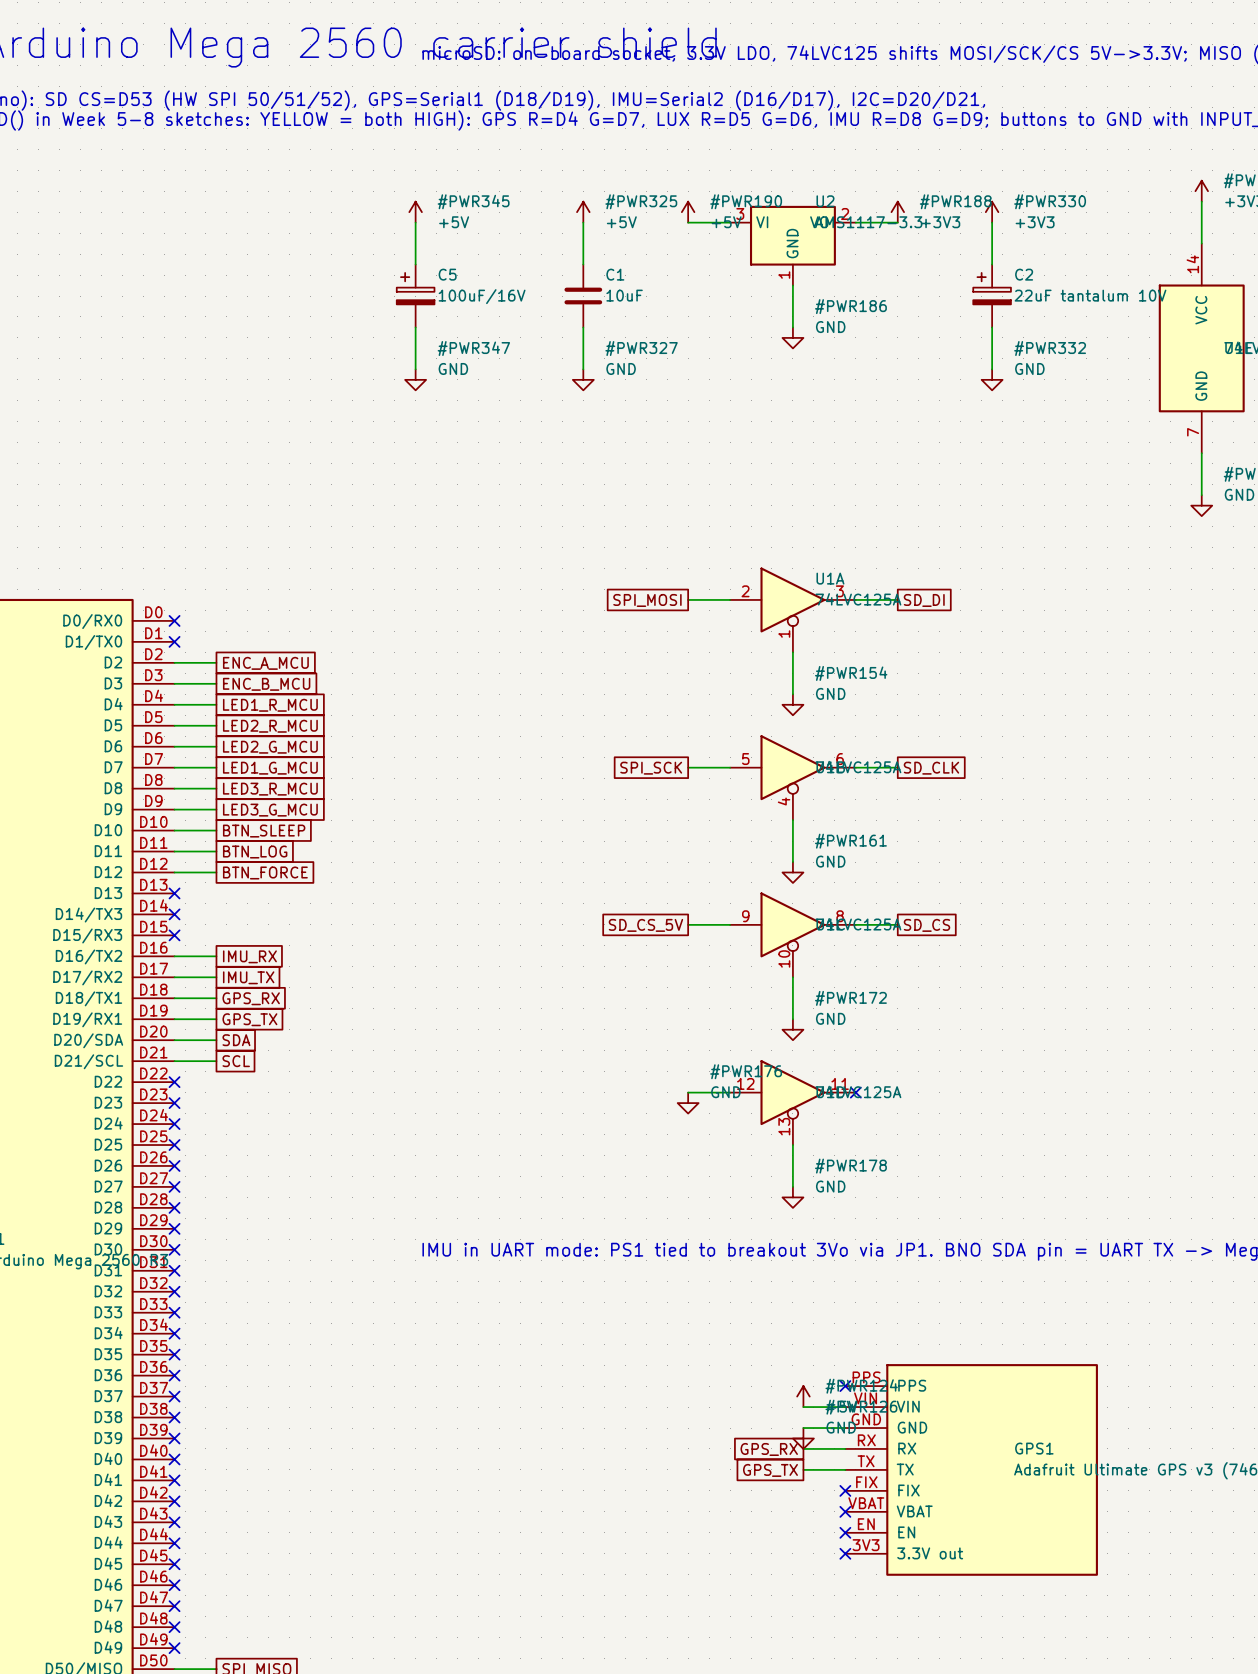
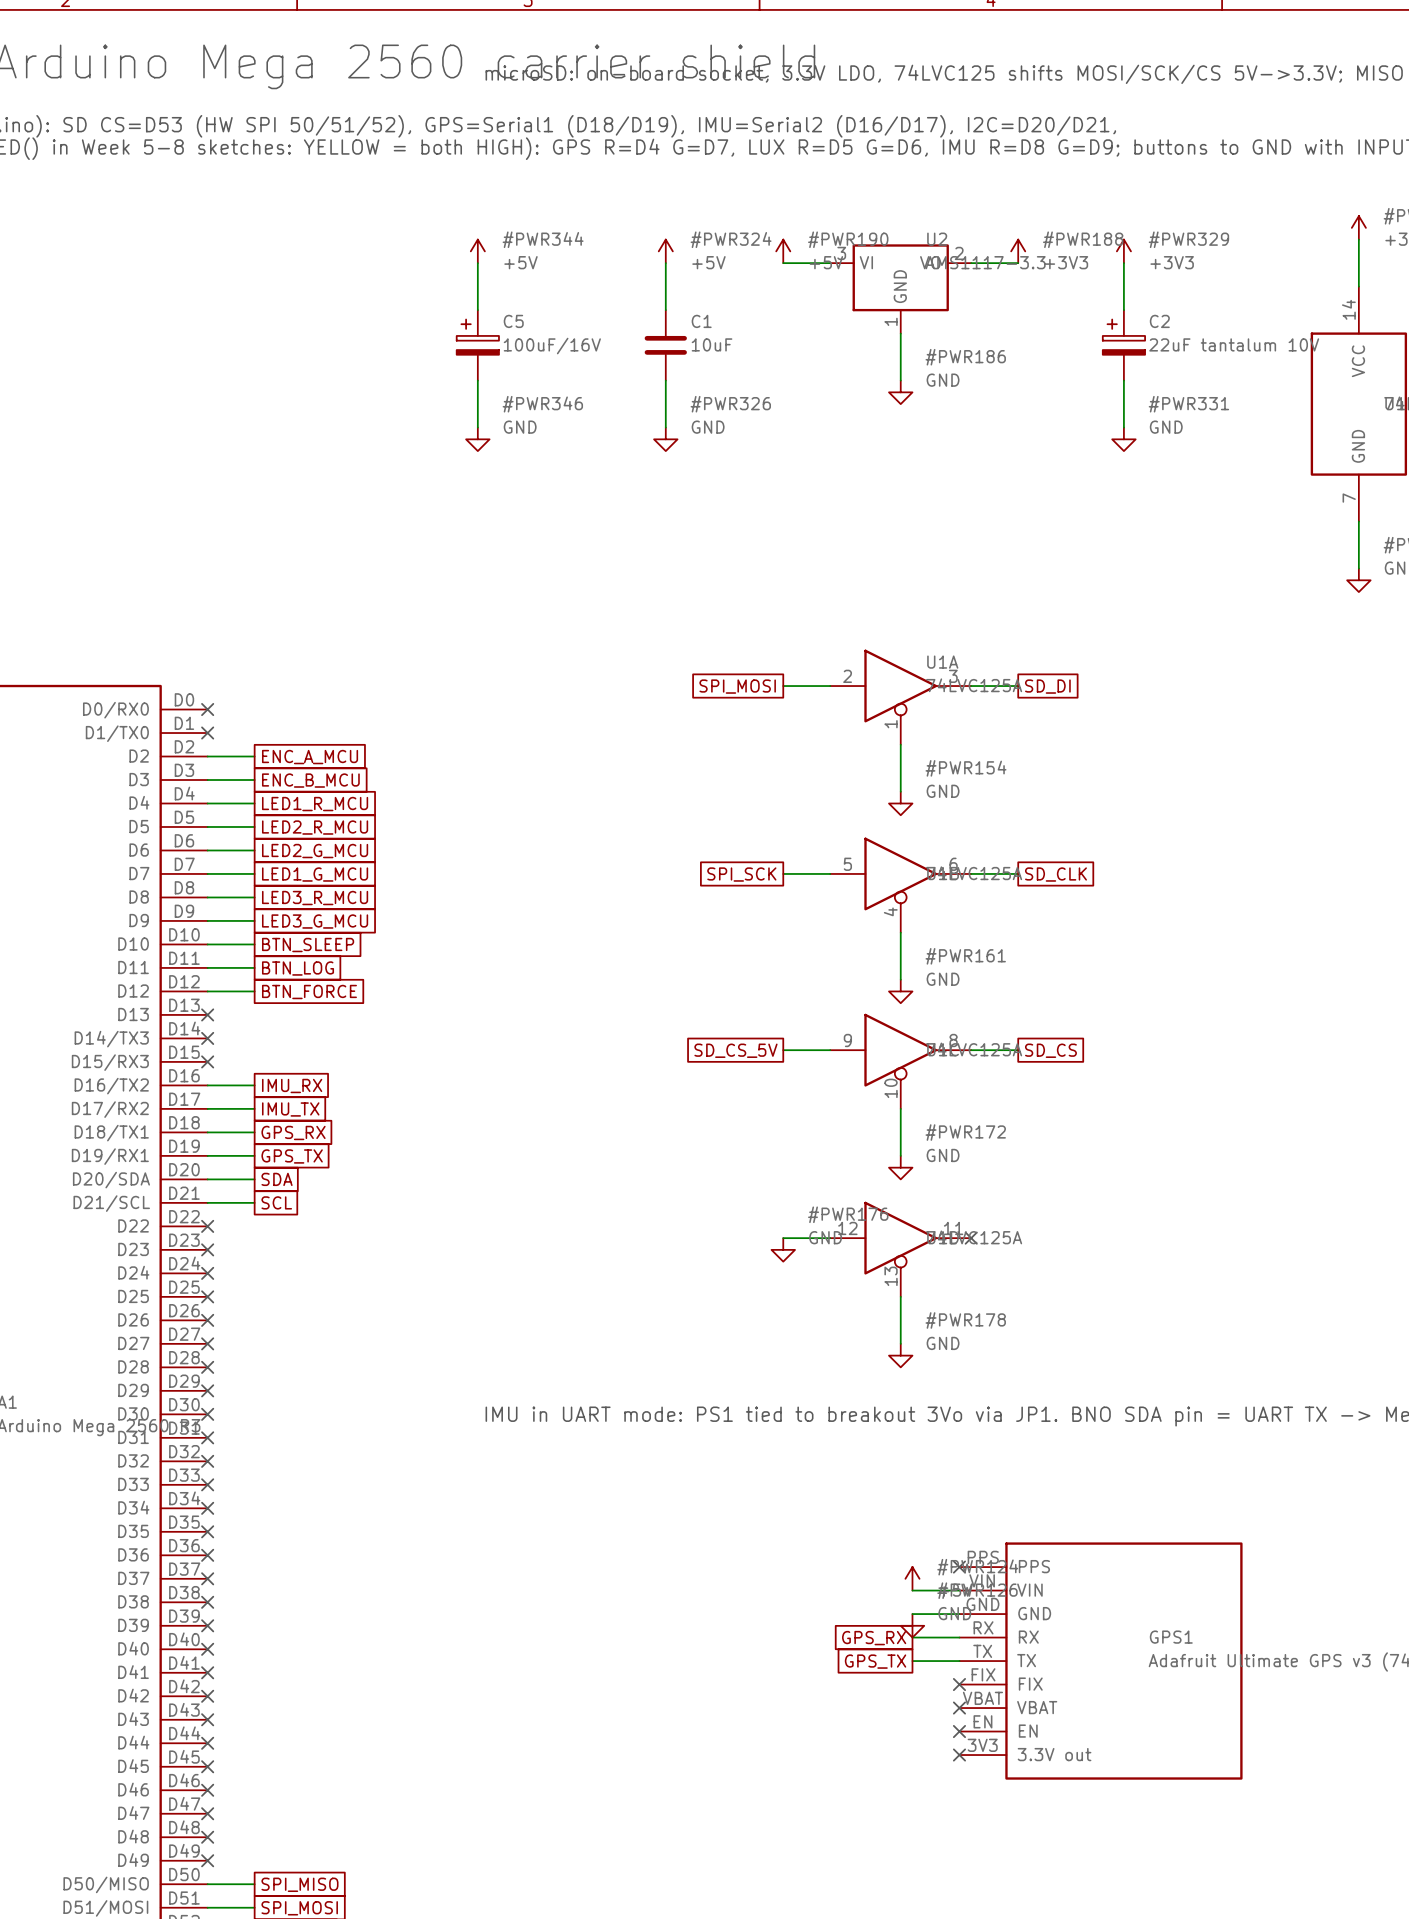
#PWR345 name: #PWR345 (473, 201) -> #PWR344 (543, 239)
#PWR325 name: #PWR325 (641, 201) -> #PWR324 (731, 239)
#PWR330 name: #PWR330 (1050, 201) -> #PWR329 (1188, 239)
#PWR347 name: #PWR347 (473, 348) -> #PWR346 (542, 404)
#PWR327 name: #PWR327 (641, 348) -> #PWR326 (730, 404)
#PWR332 name: #PWR332 (1050, 348) -> #PWR331 (1188, 404)

